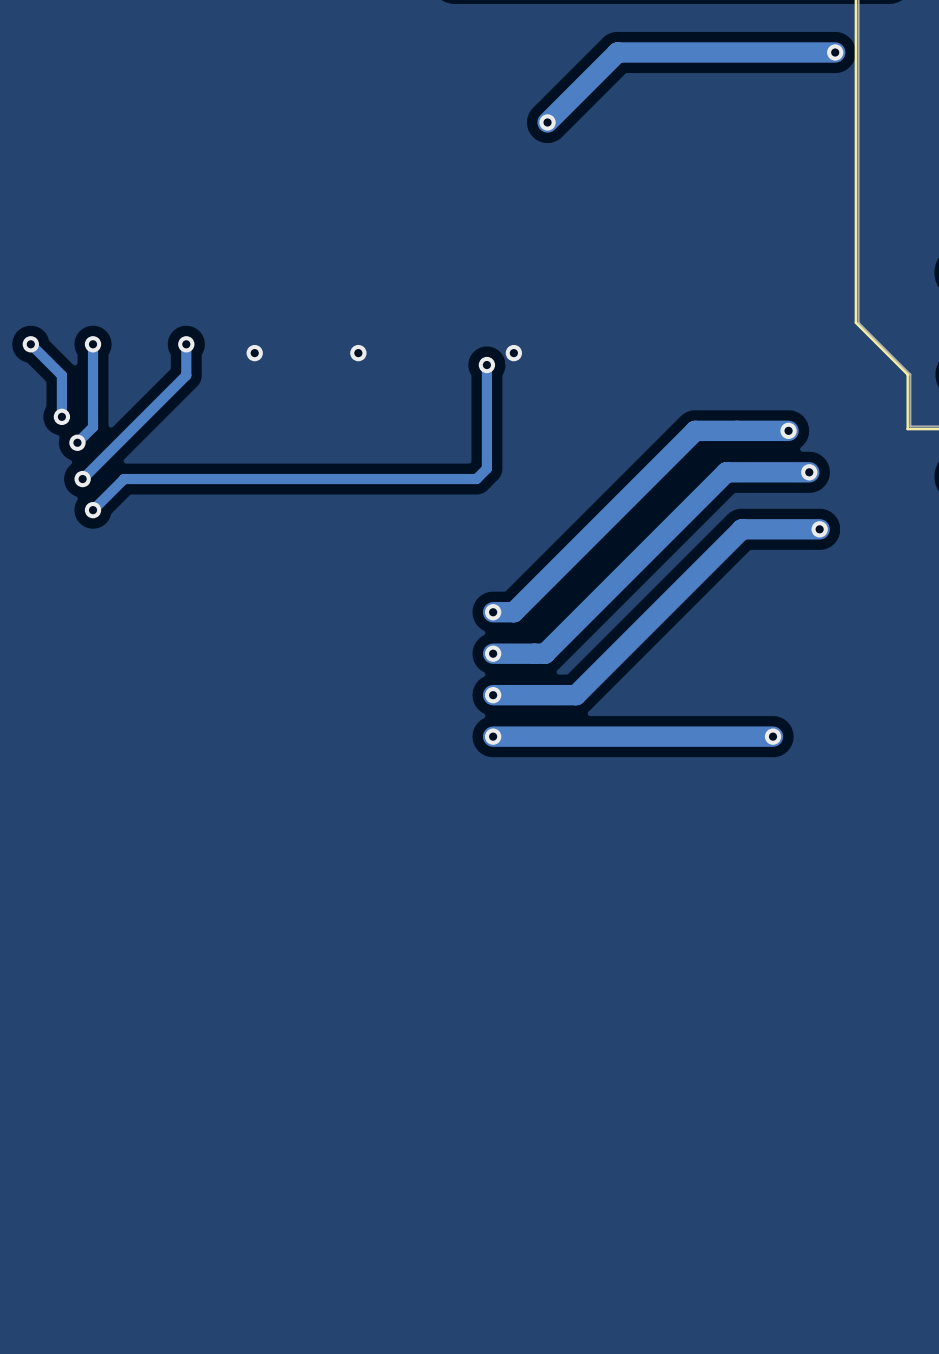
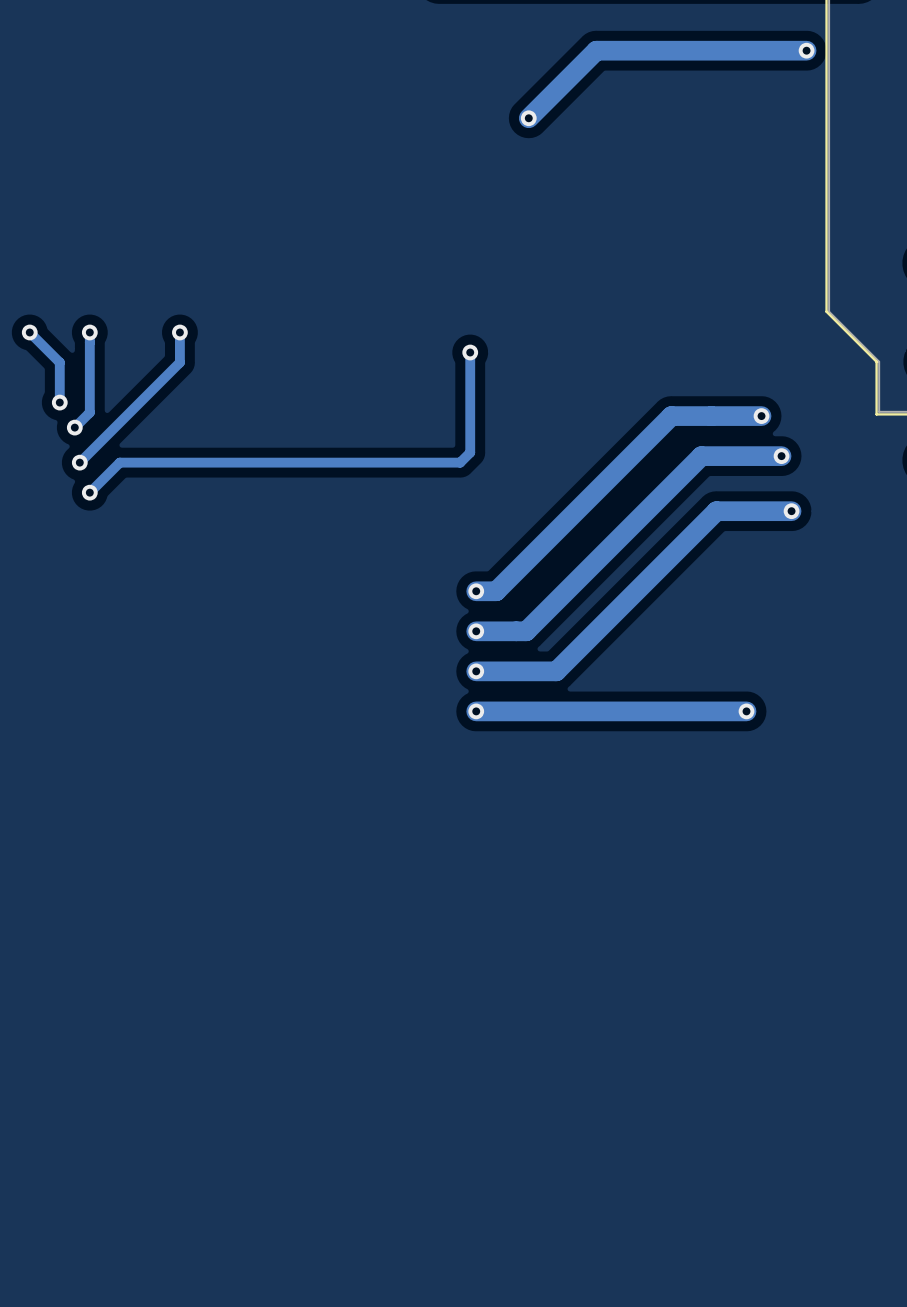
via: (254, 353) -> none
via: (358, 353) -> none
via: (513, 353) -> none

